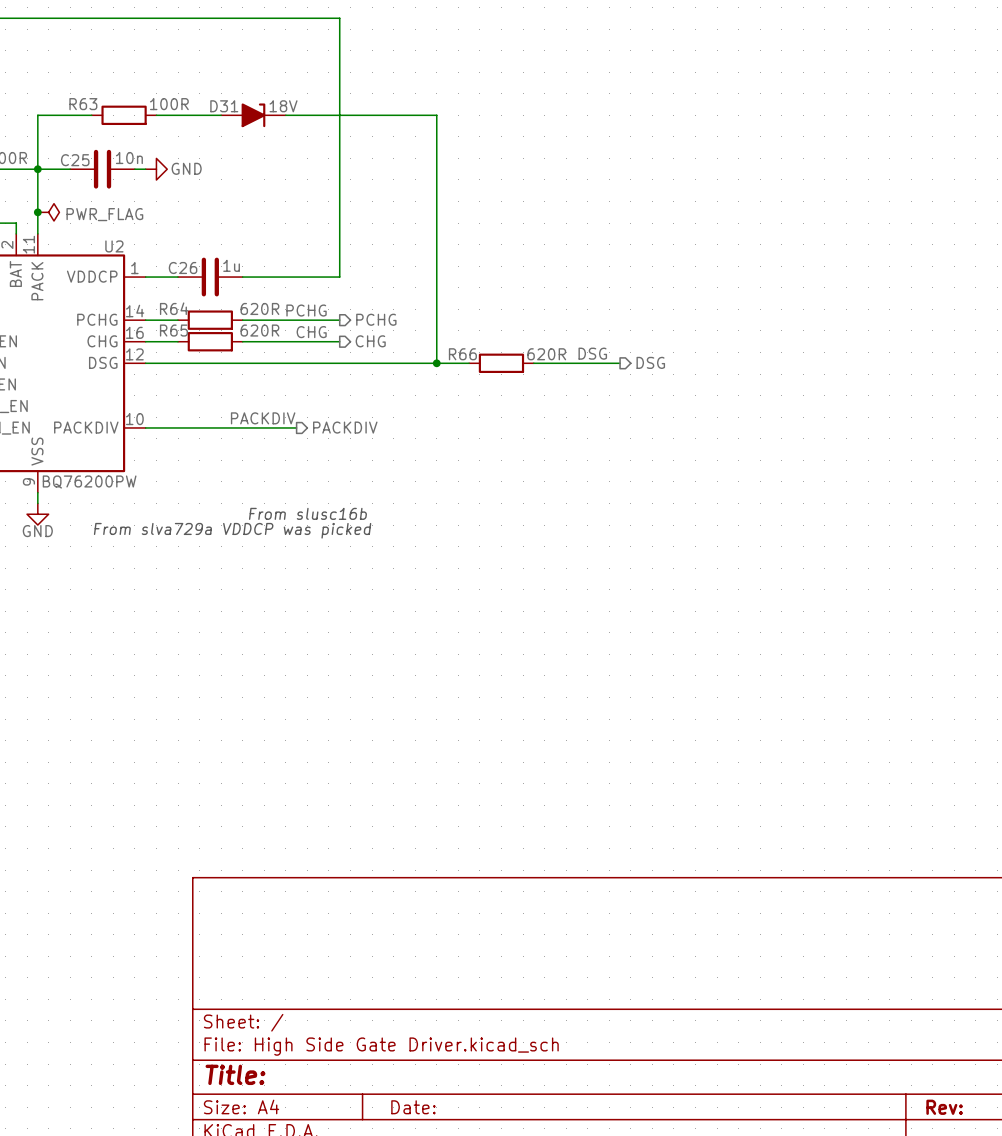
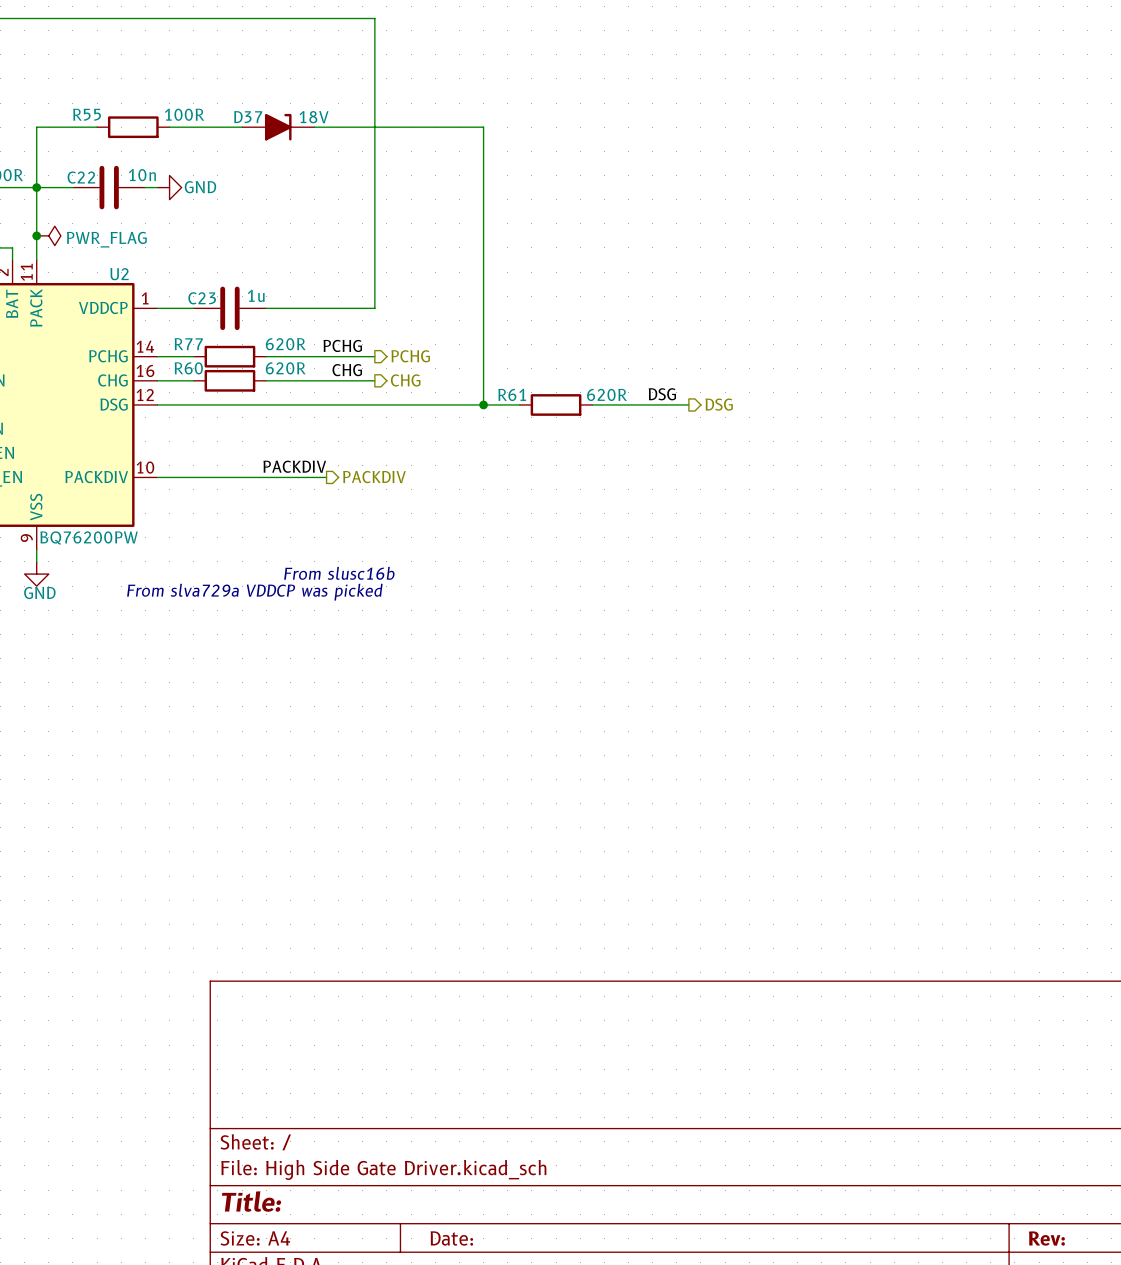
R63 name: R63 (83, 104) -> R55 (87, 114)
D31 name: D31 (224, 106) -> D37 (248, 117)
C25 name: C25 (75, 160) -> C22 (81, 177)
C26 name: C26 (183, 268) -> C23 (202, 298)
R64 name: R64 (174, 308) -> R77 (188, 344)
R65 name: R65 (173, 330) -> R60 (188, 368)
R66 name: R66 (462, 354) -> R61 (512, 394)

